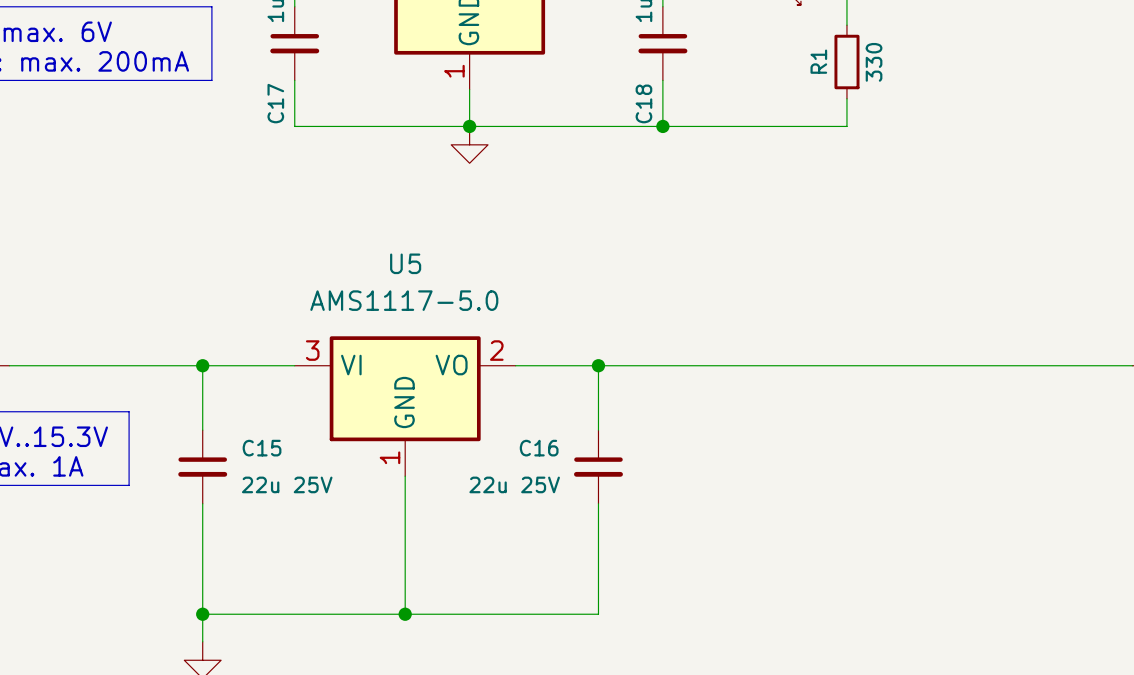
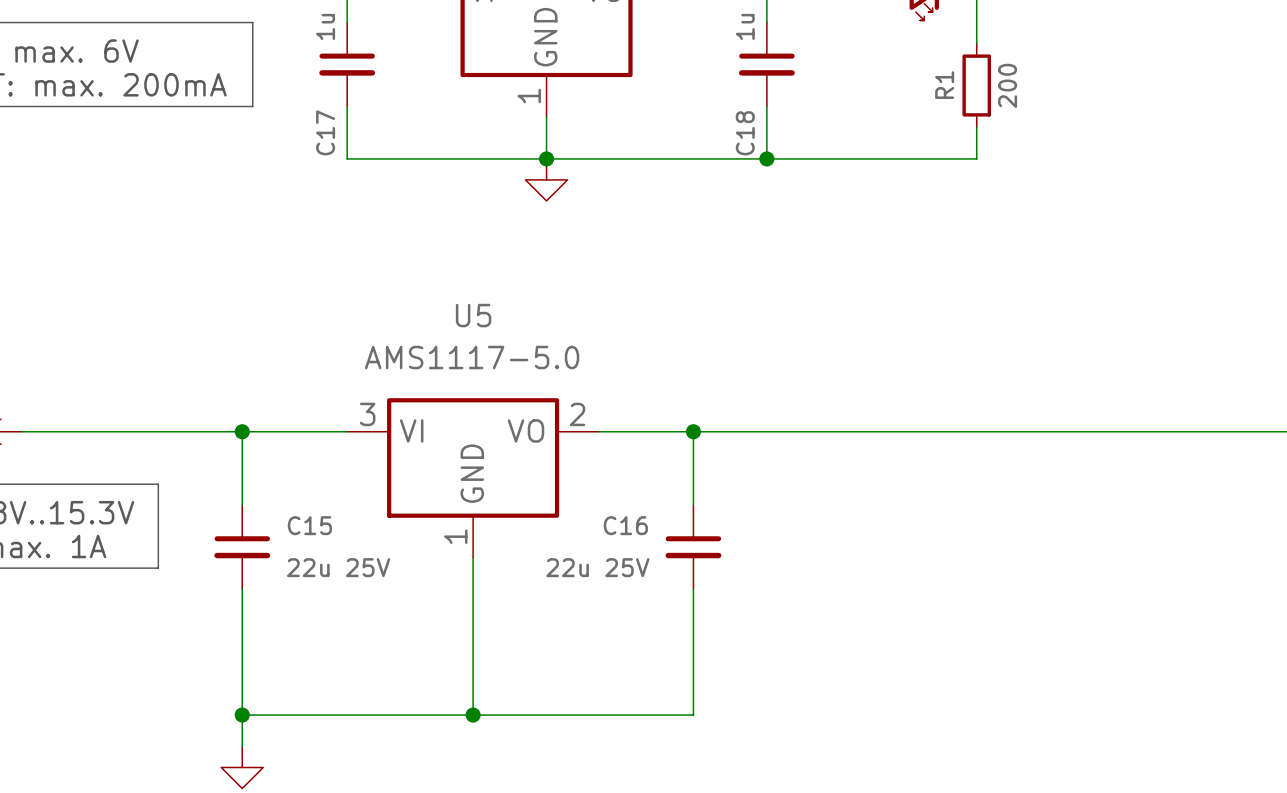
R1 value: 330 (874, 62) -> 200 (1007, 85)

